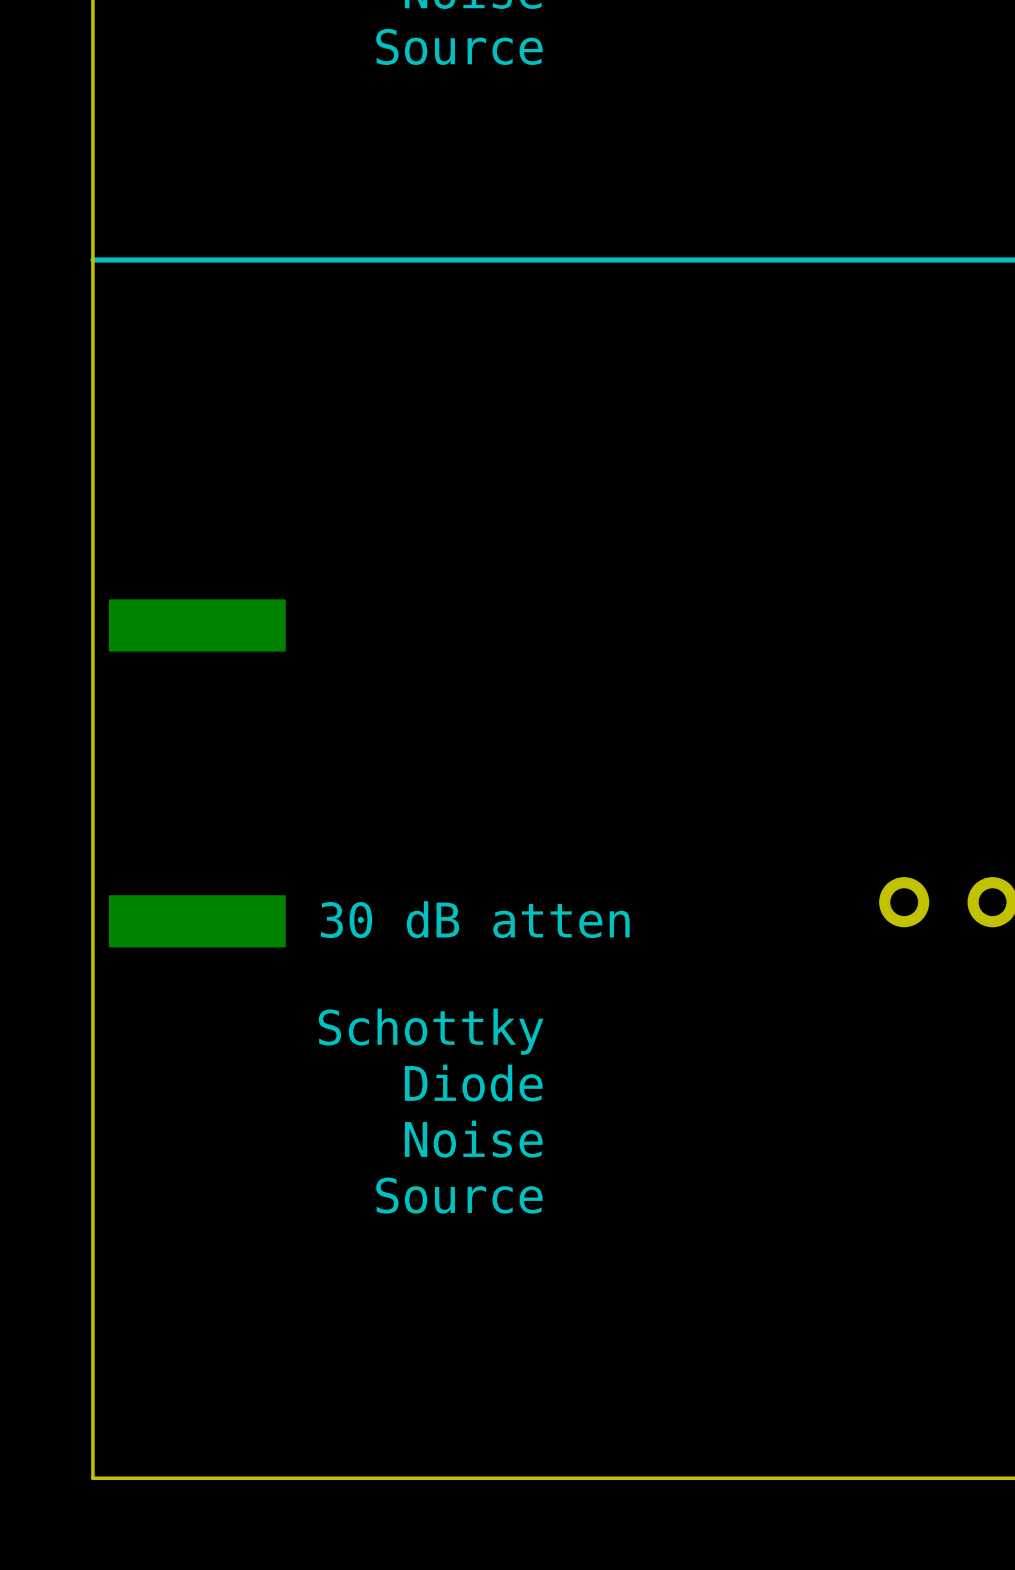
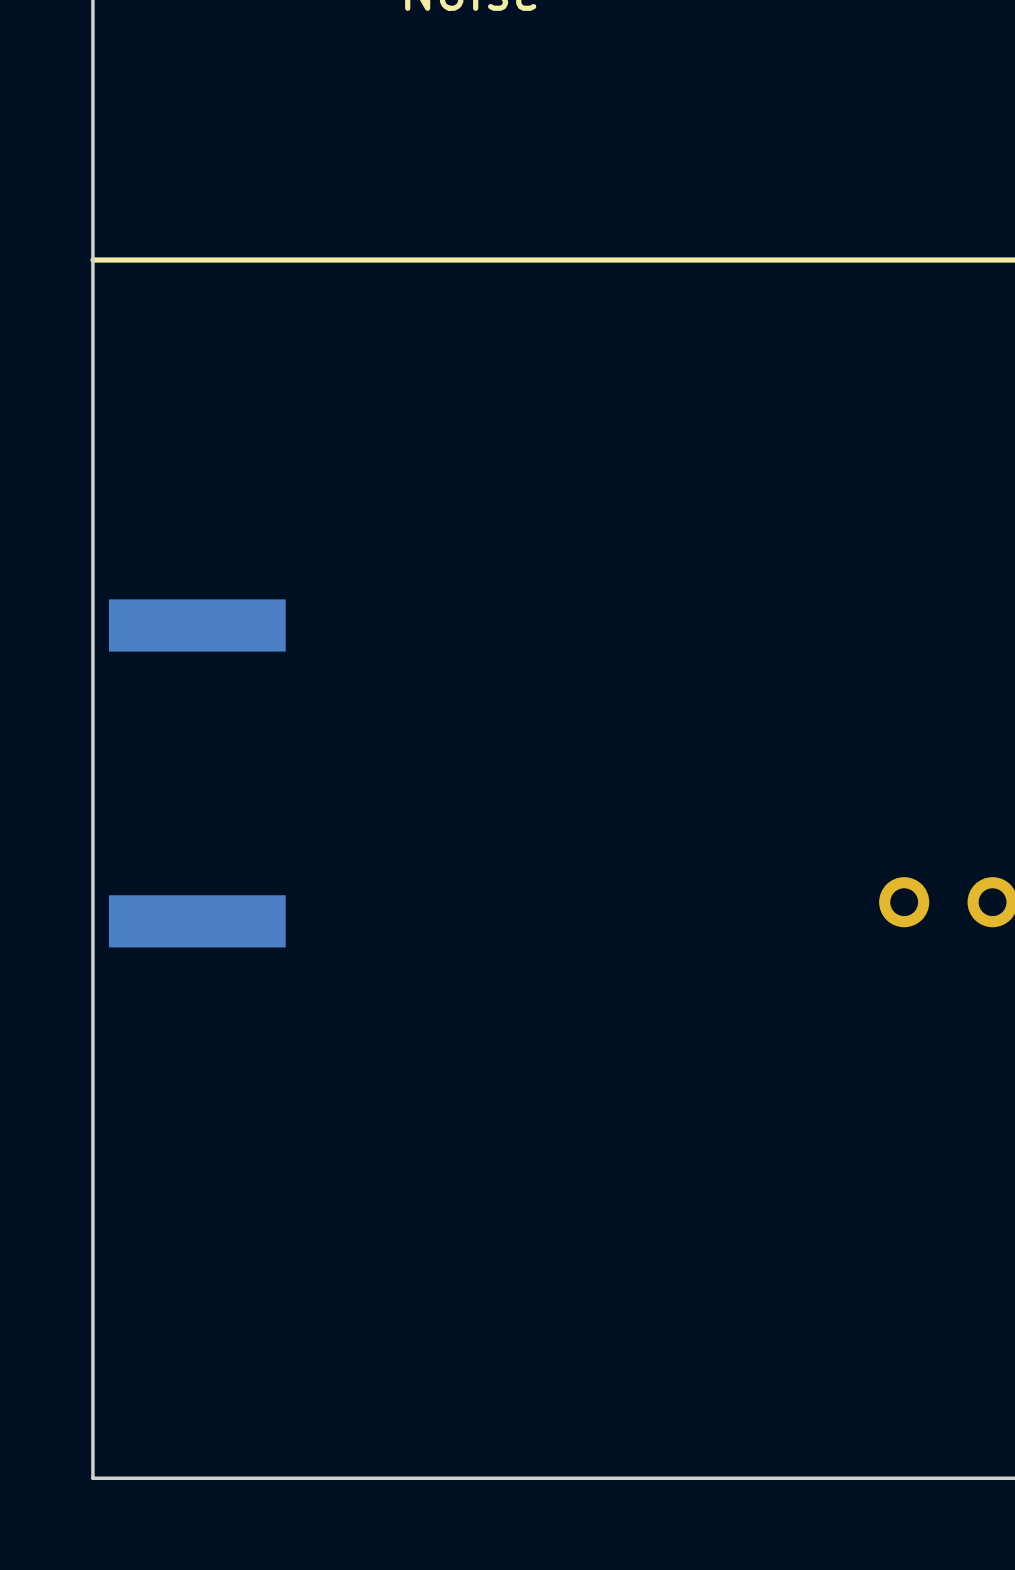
text: Source (459, 46) -> none
text: 30 dB atten (475, 919) -> none
text: Schottky (431, 1031) -> none
text: Diode (473, 1083) -> none
text: Noise (473, 1139) -> none
text: Source (459, 1195) -> none

